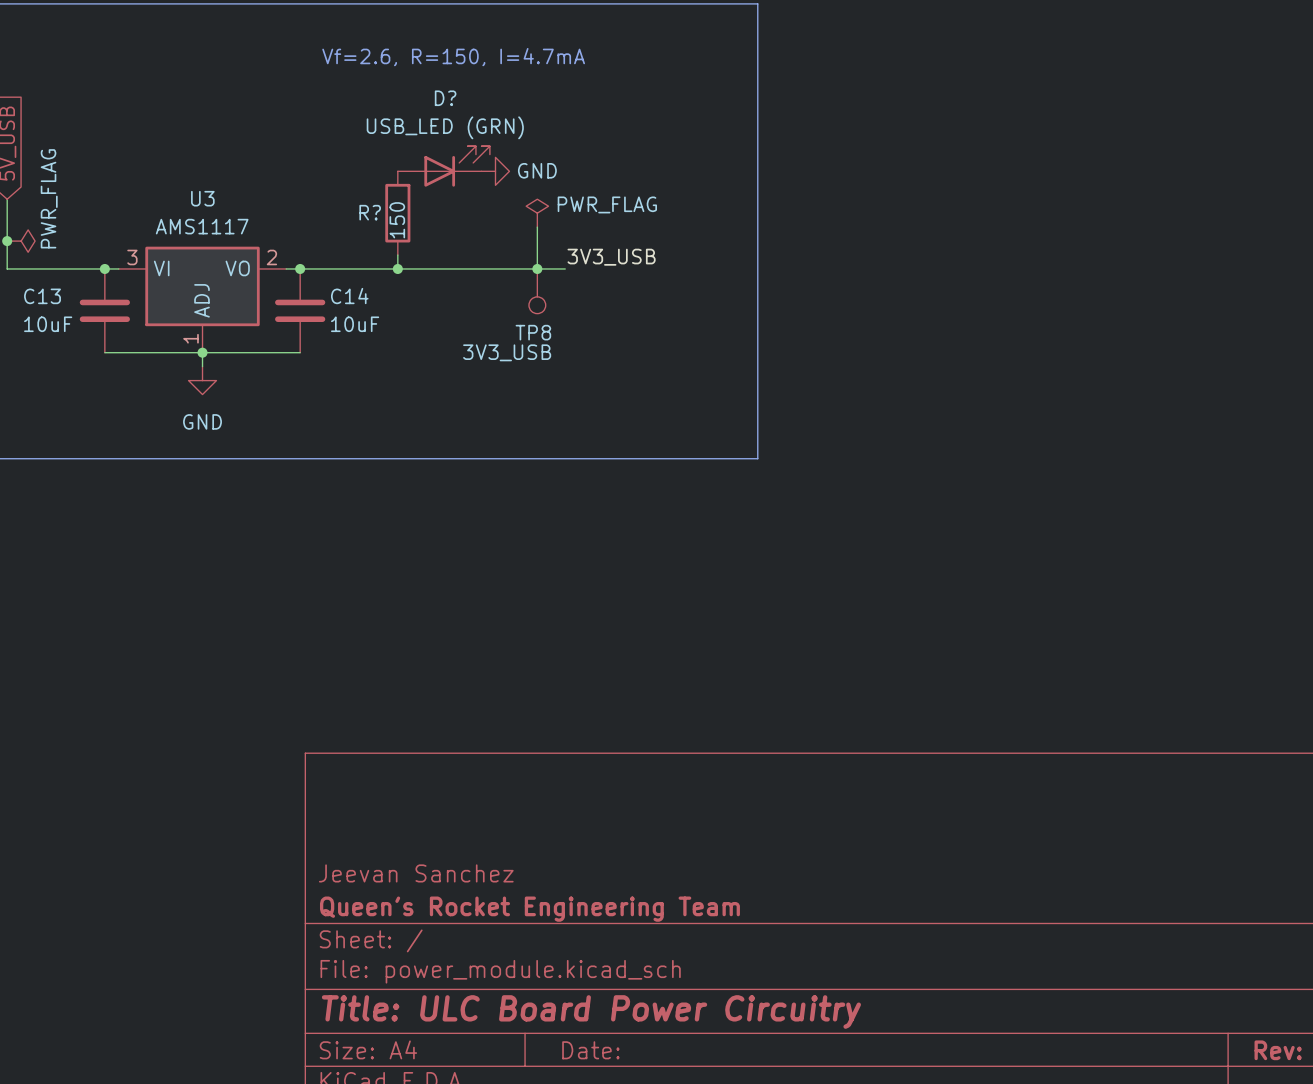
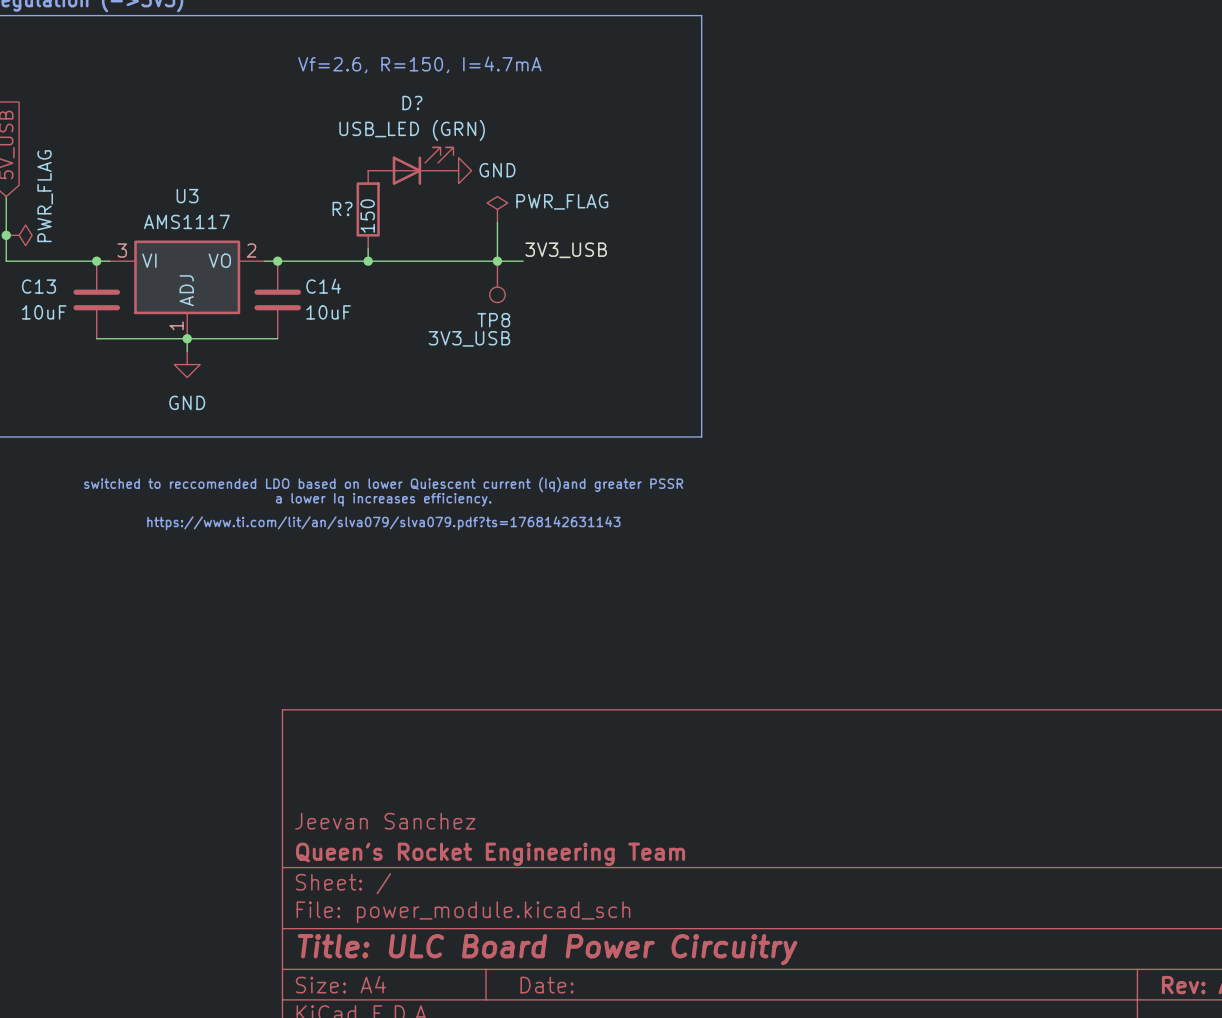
text: none -> switched to reccomended LDO based on lower Quiescent current (Iq)and greater PSSR (383, 484)
text: none -> a lower Iq increases efficiency. (383, 499)
text: none -> https://www.ti.com/lit/an/slva079/slva079.pdf?ts=1768142631143 (383, 523)

